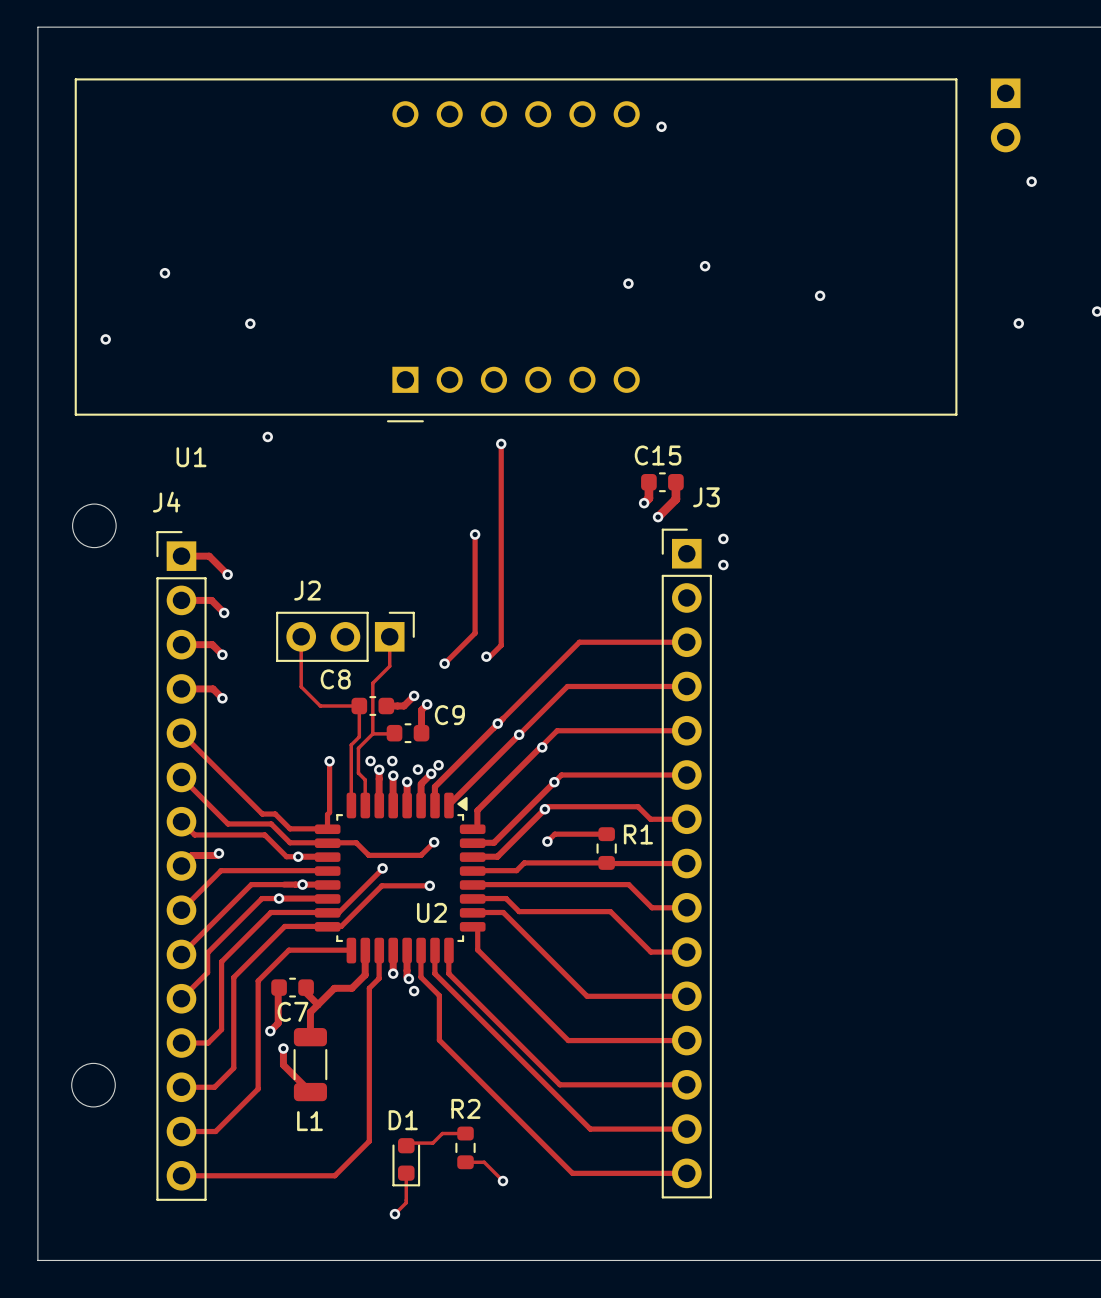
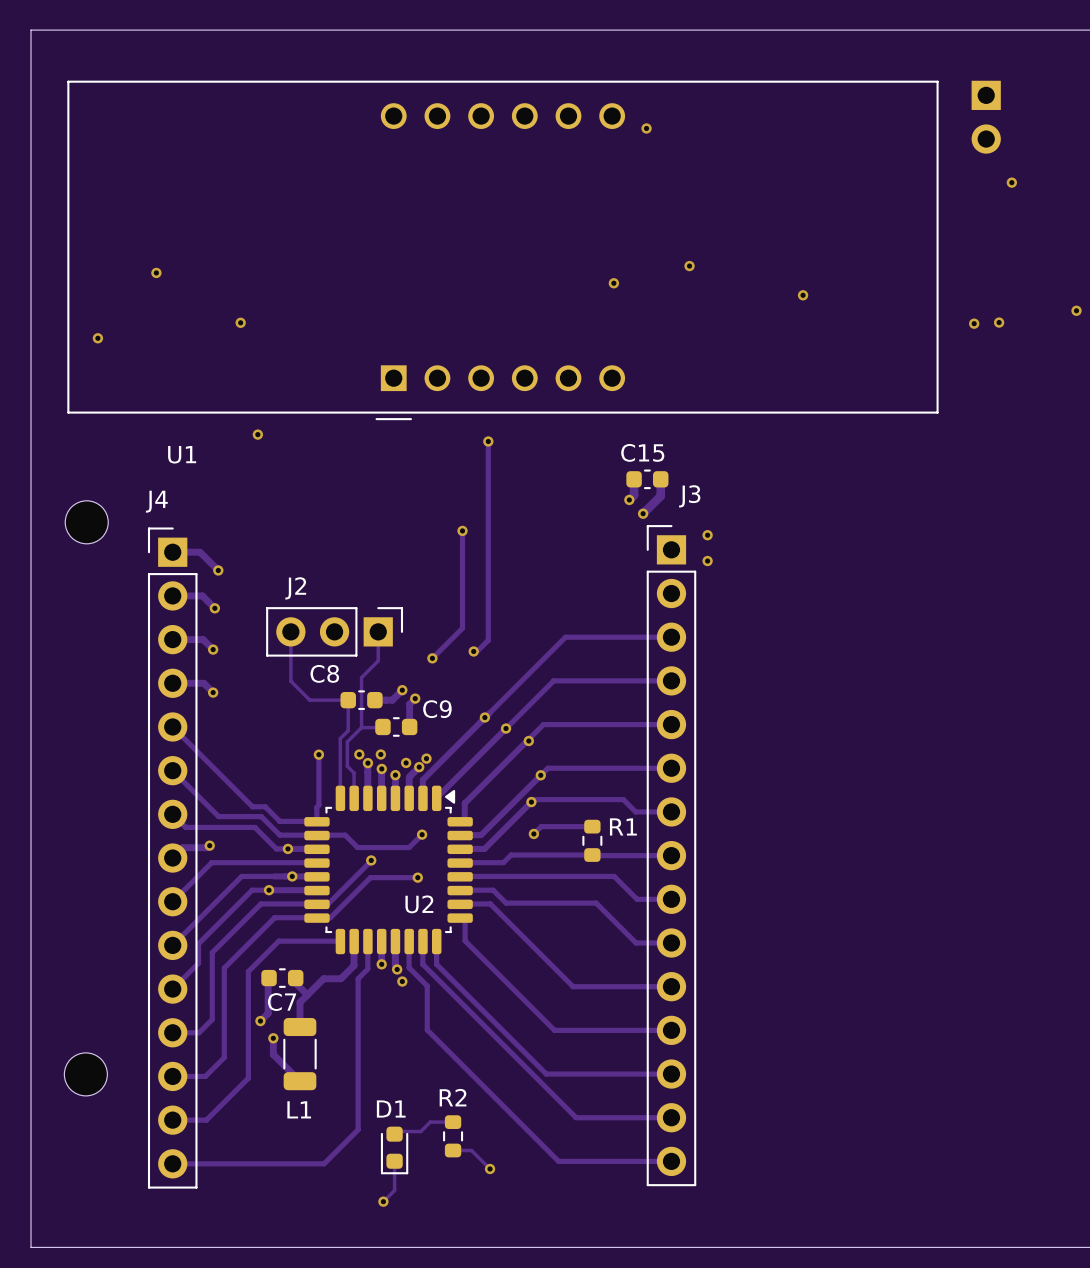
via: none -> (974, 323)

